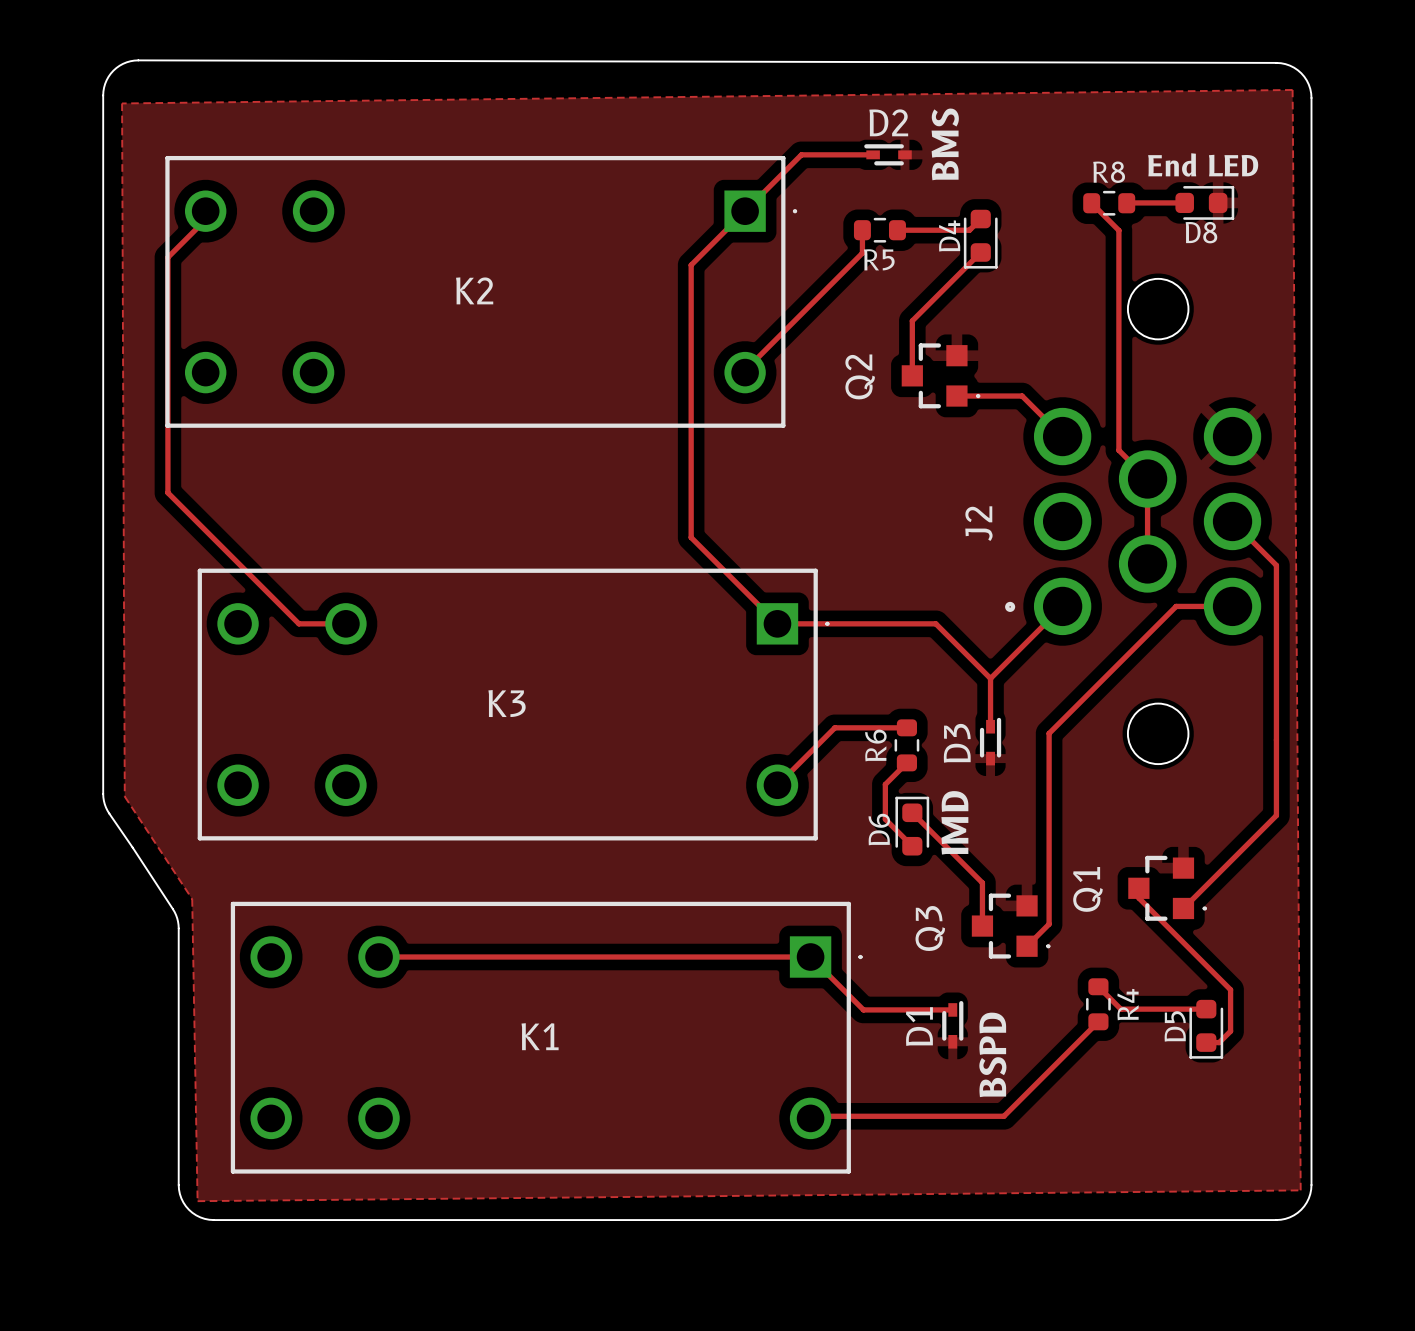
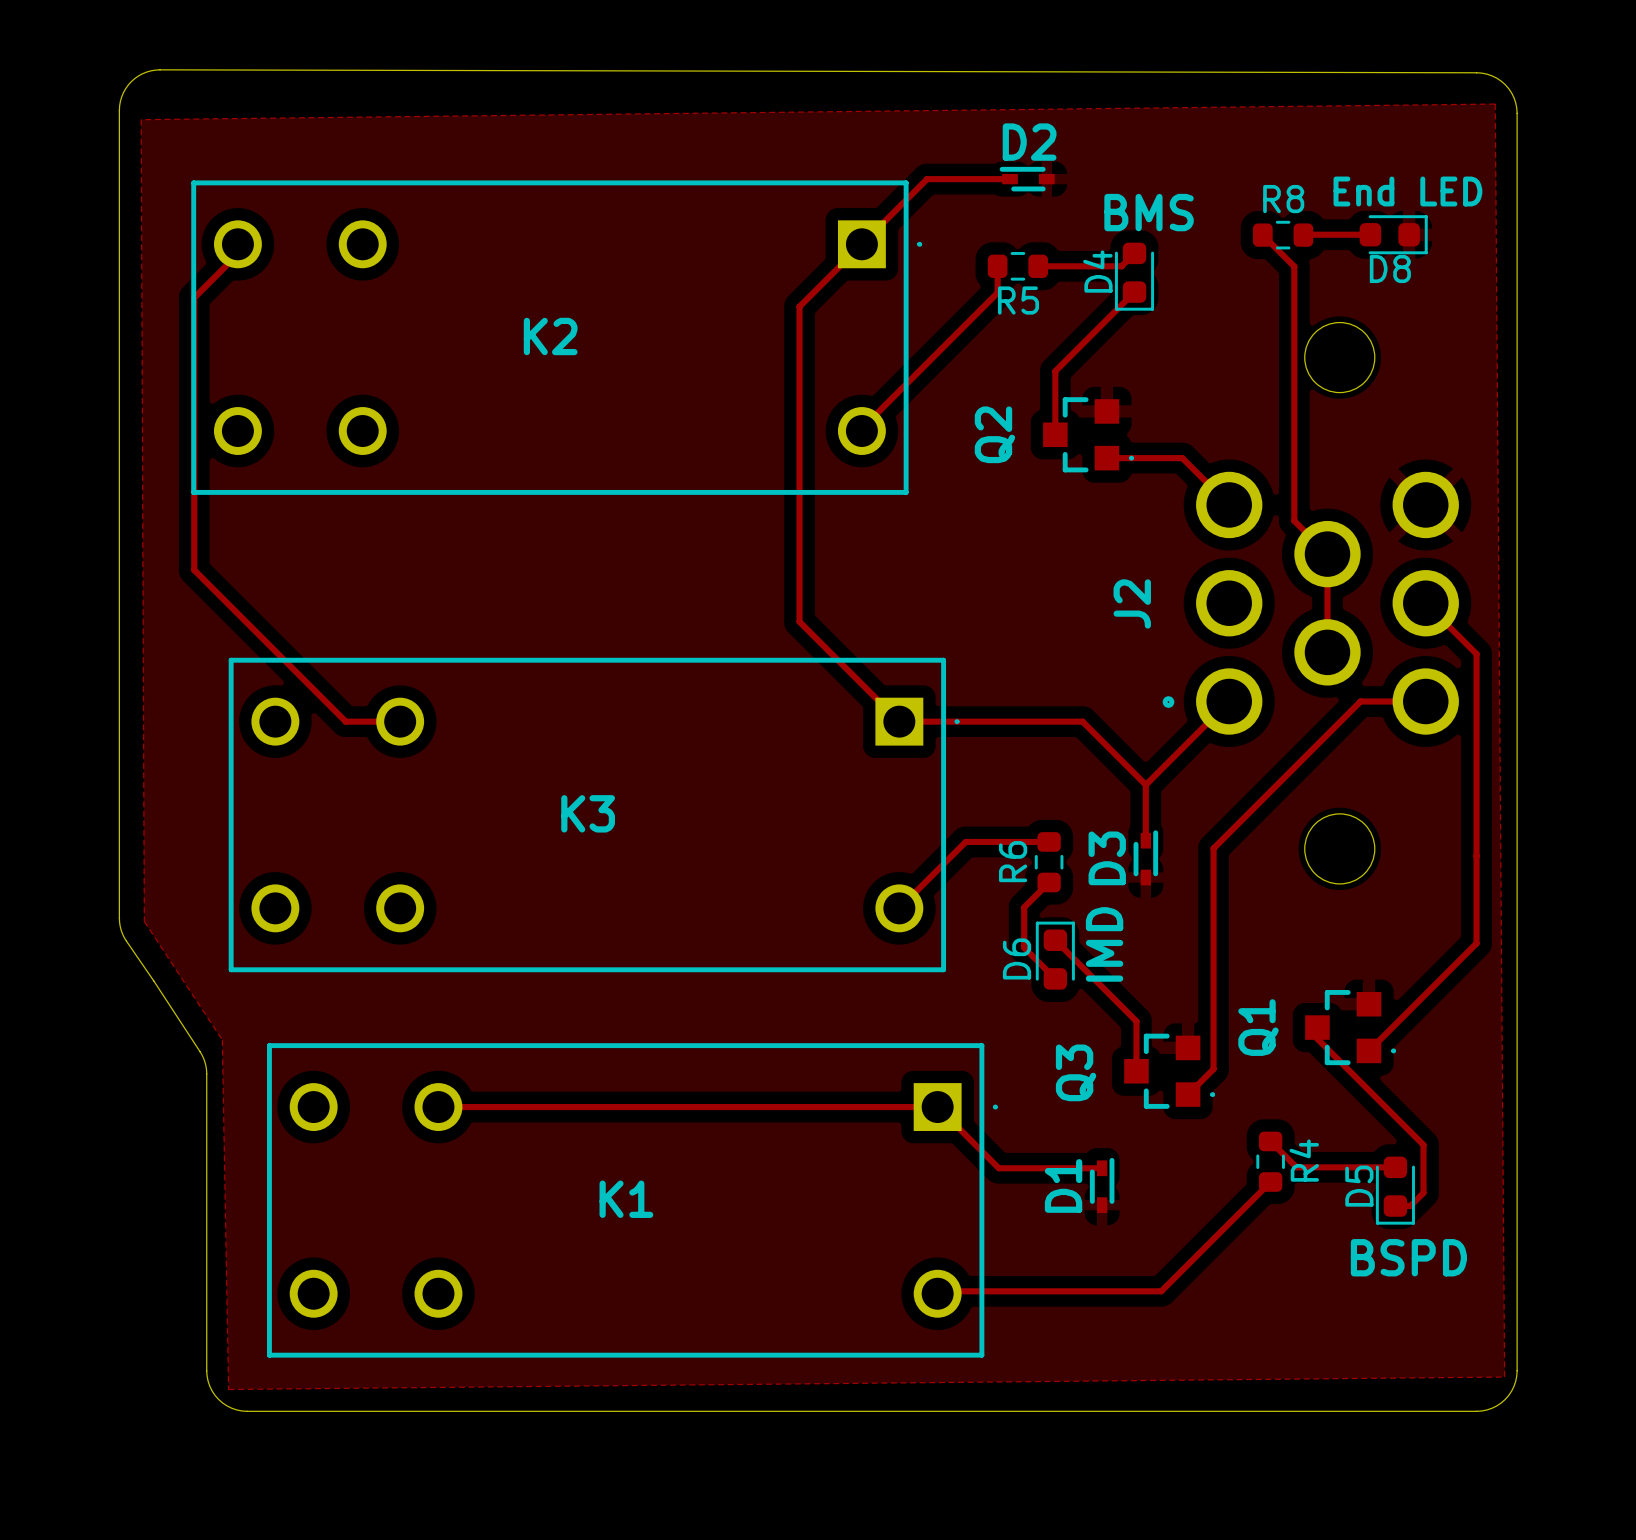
text rotation: 0° (945, 144) -> 90° clockwise (1149, 212)
text rotation: 0° (992, 1054) -> 90° clockwise (1408, 1257)
text position: BSPD (992, 1054) -> BSPD (1408, 1257)

